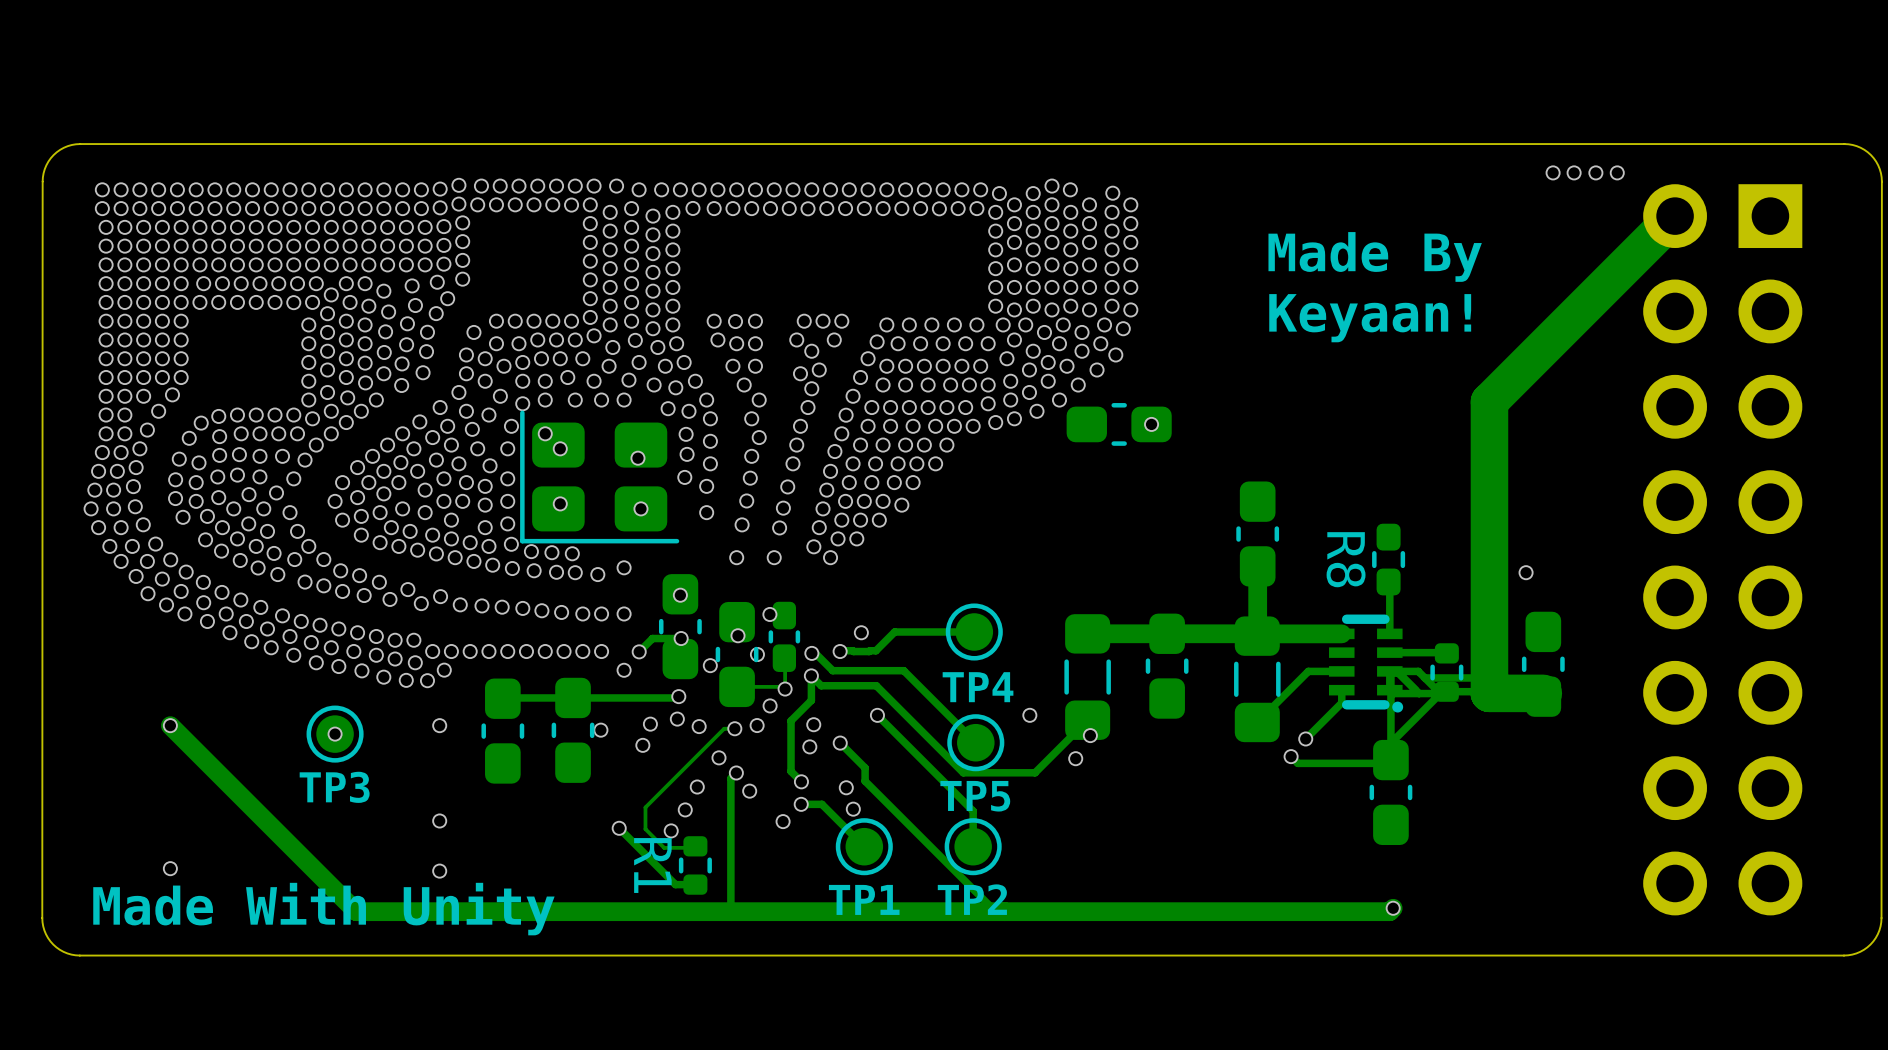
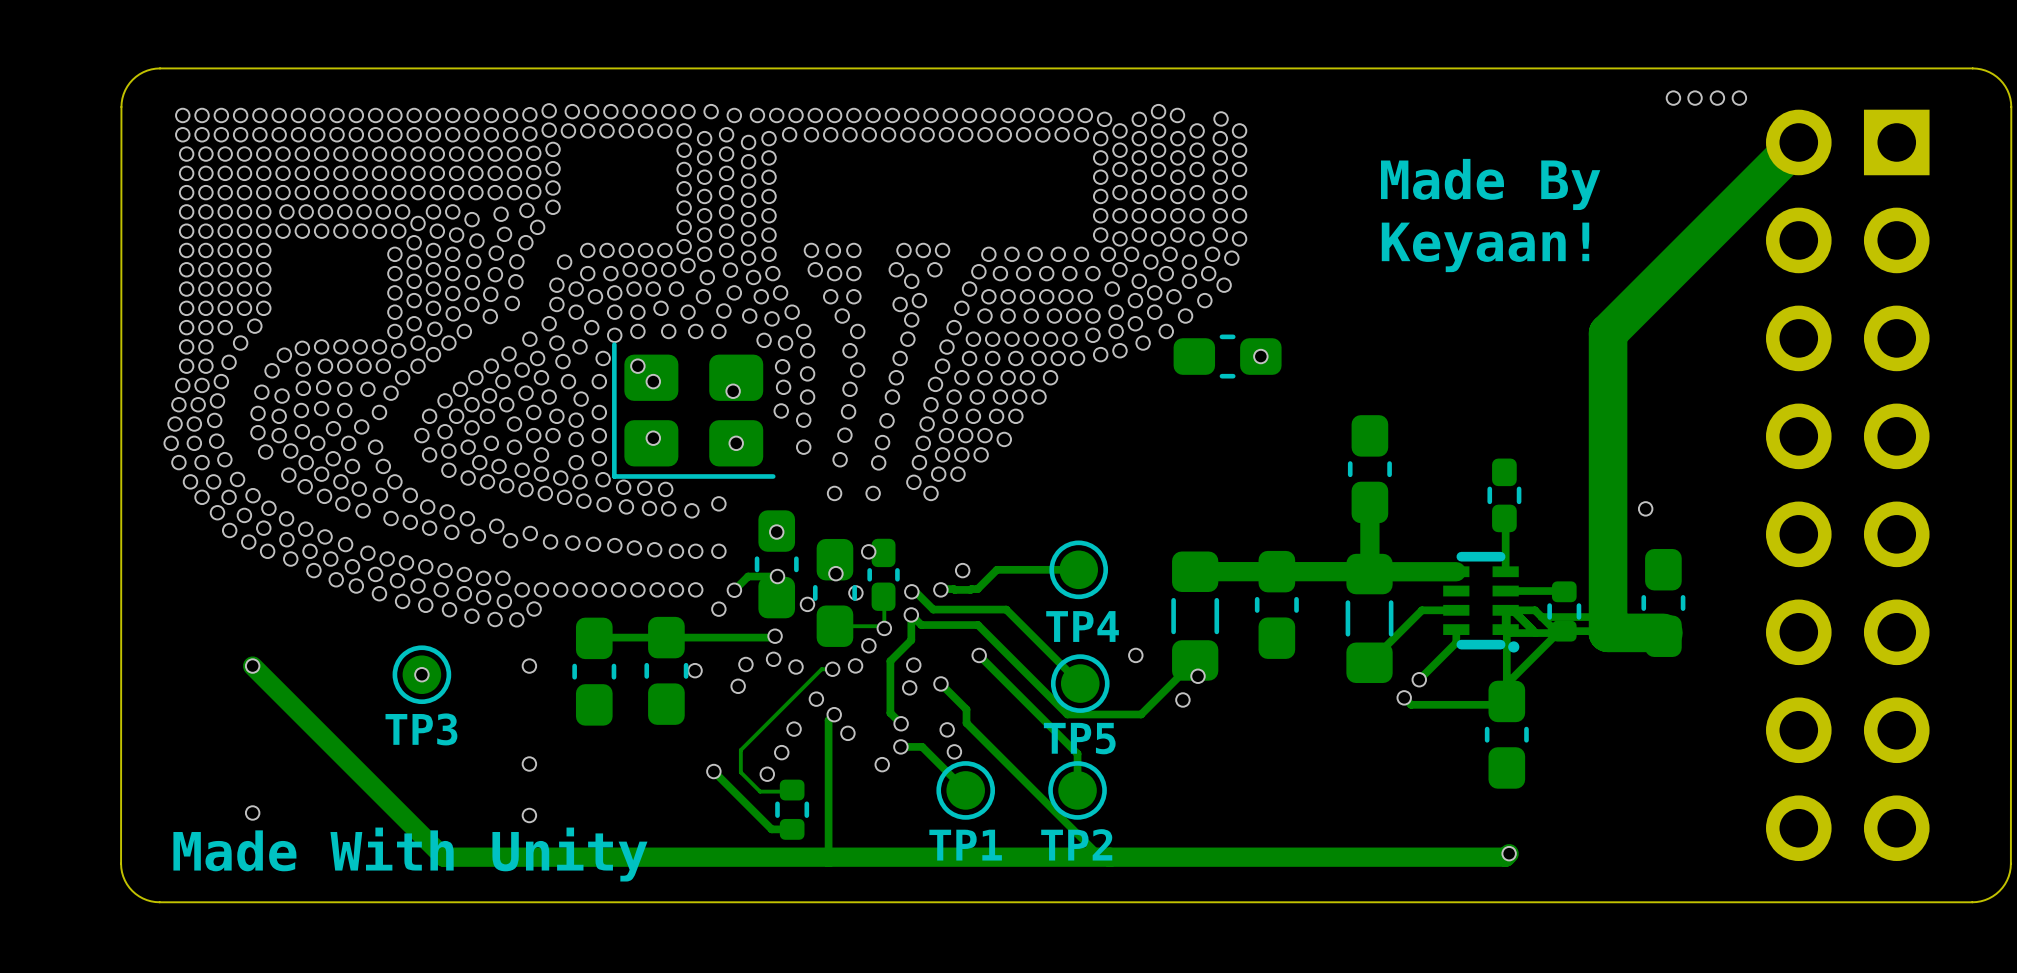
R8 name: R8 (1346, 559) -> none
R1 name: R1 (652, 865) -> none

